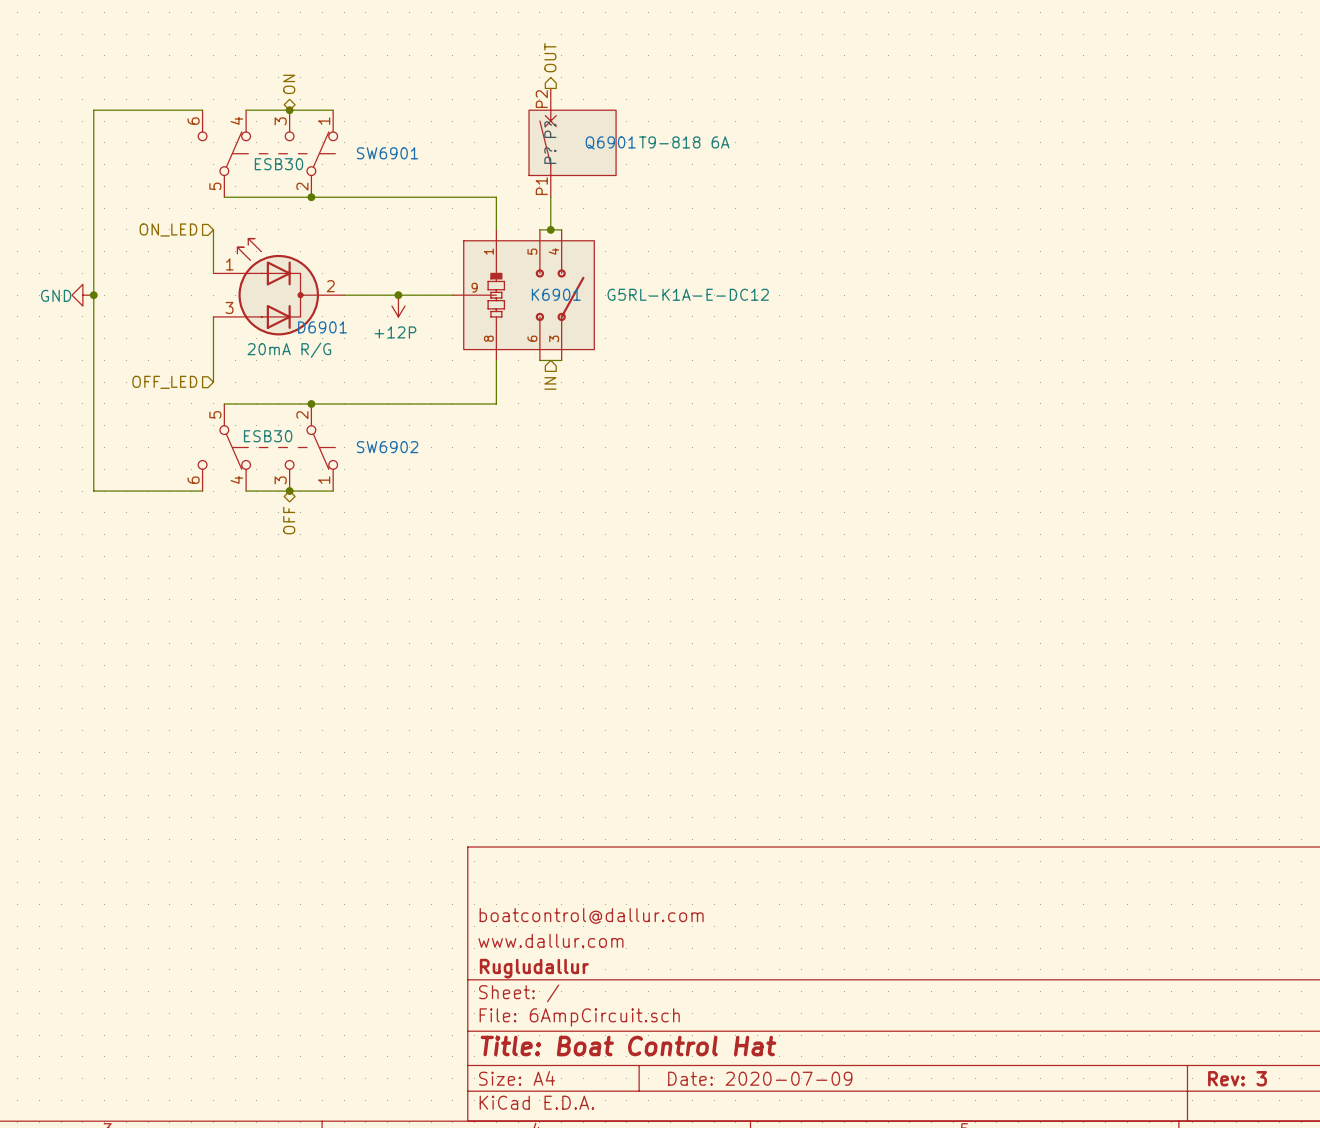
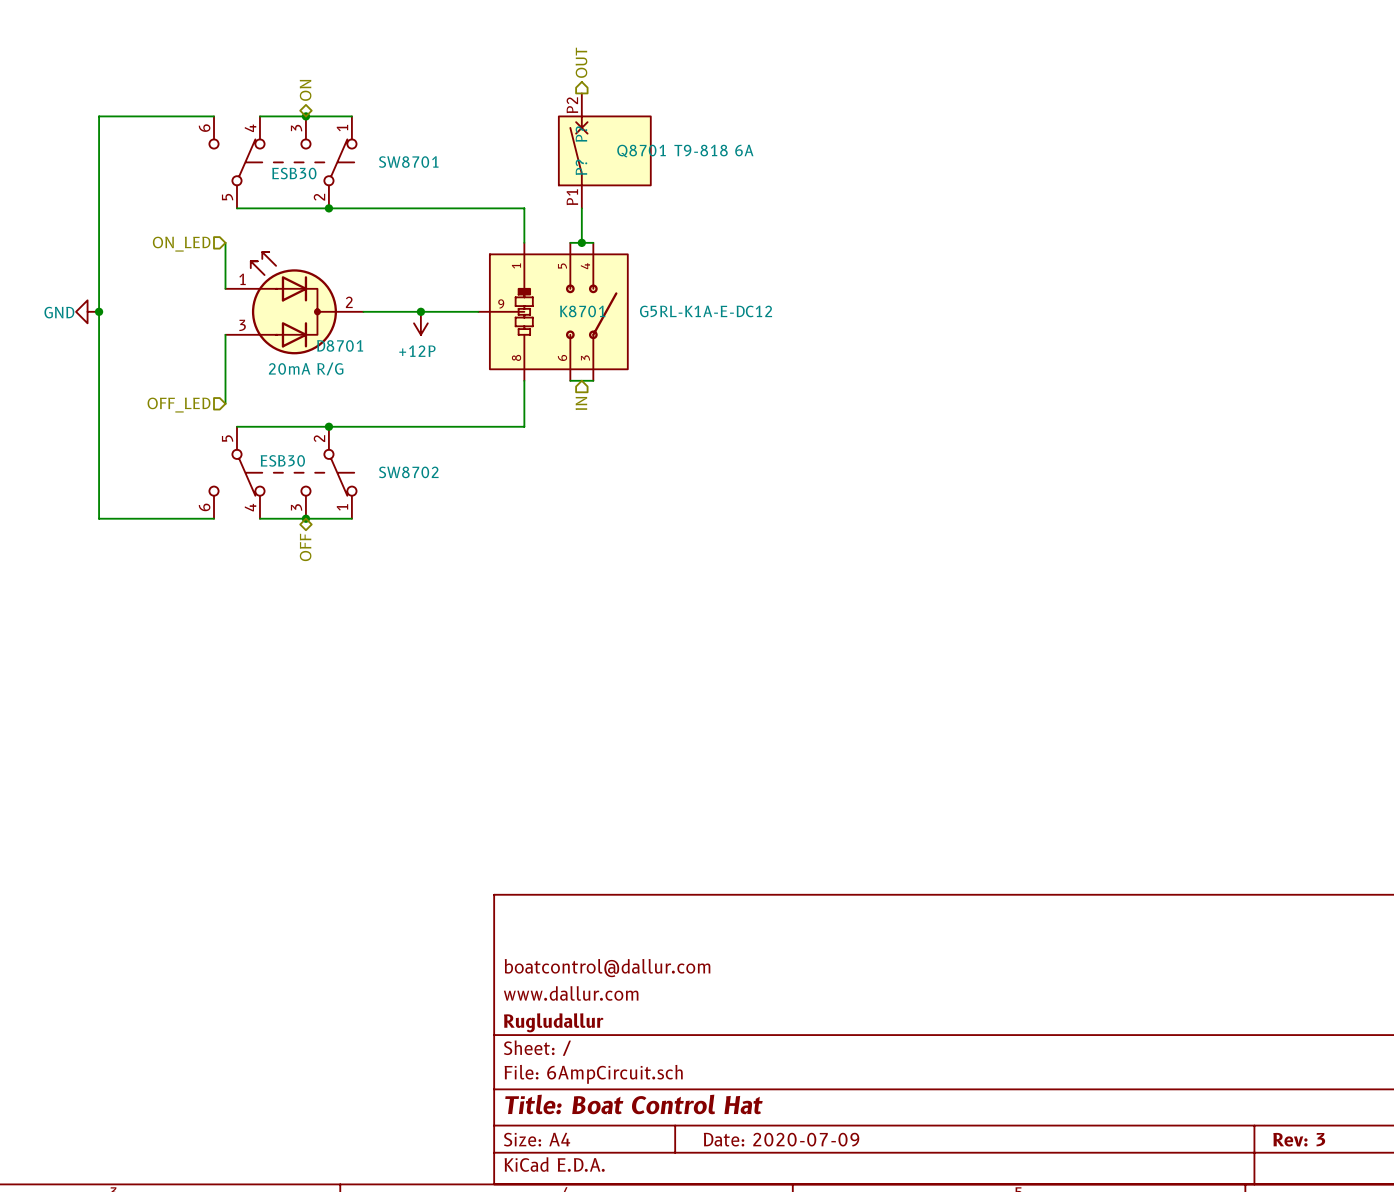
Q6901 name: Q6901 (610, 142) -> Q8701 (641, 151)
SW6901 name: SW6901 (387, 153) -> SW8701 (408, 162)
K6901 name: K6901 (556, 294) -> K8701 (582, 311)
D6901 name: D6901 (322, 327) -> D8701 (340, 345)
SW6902 name: SW6902 (387, 447) -> SW8702 (408, 472)

